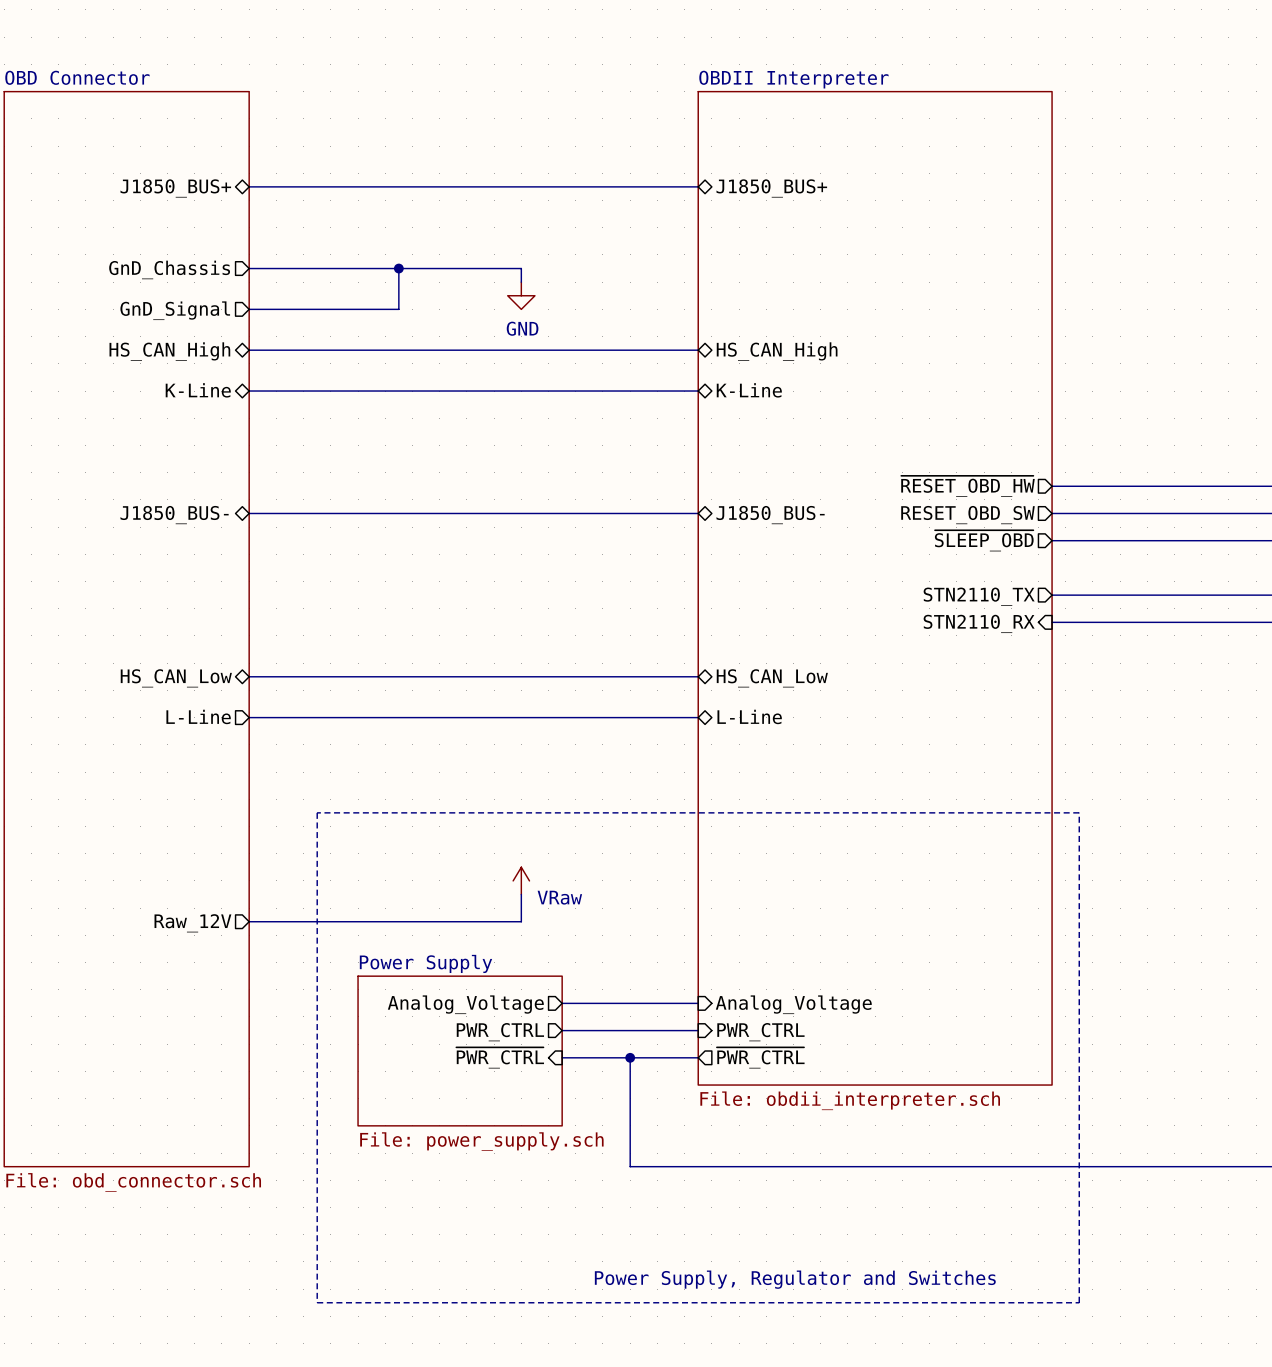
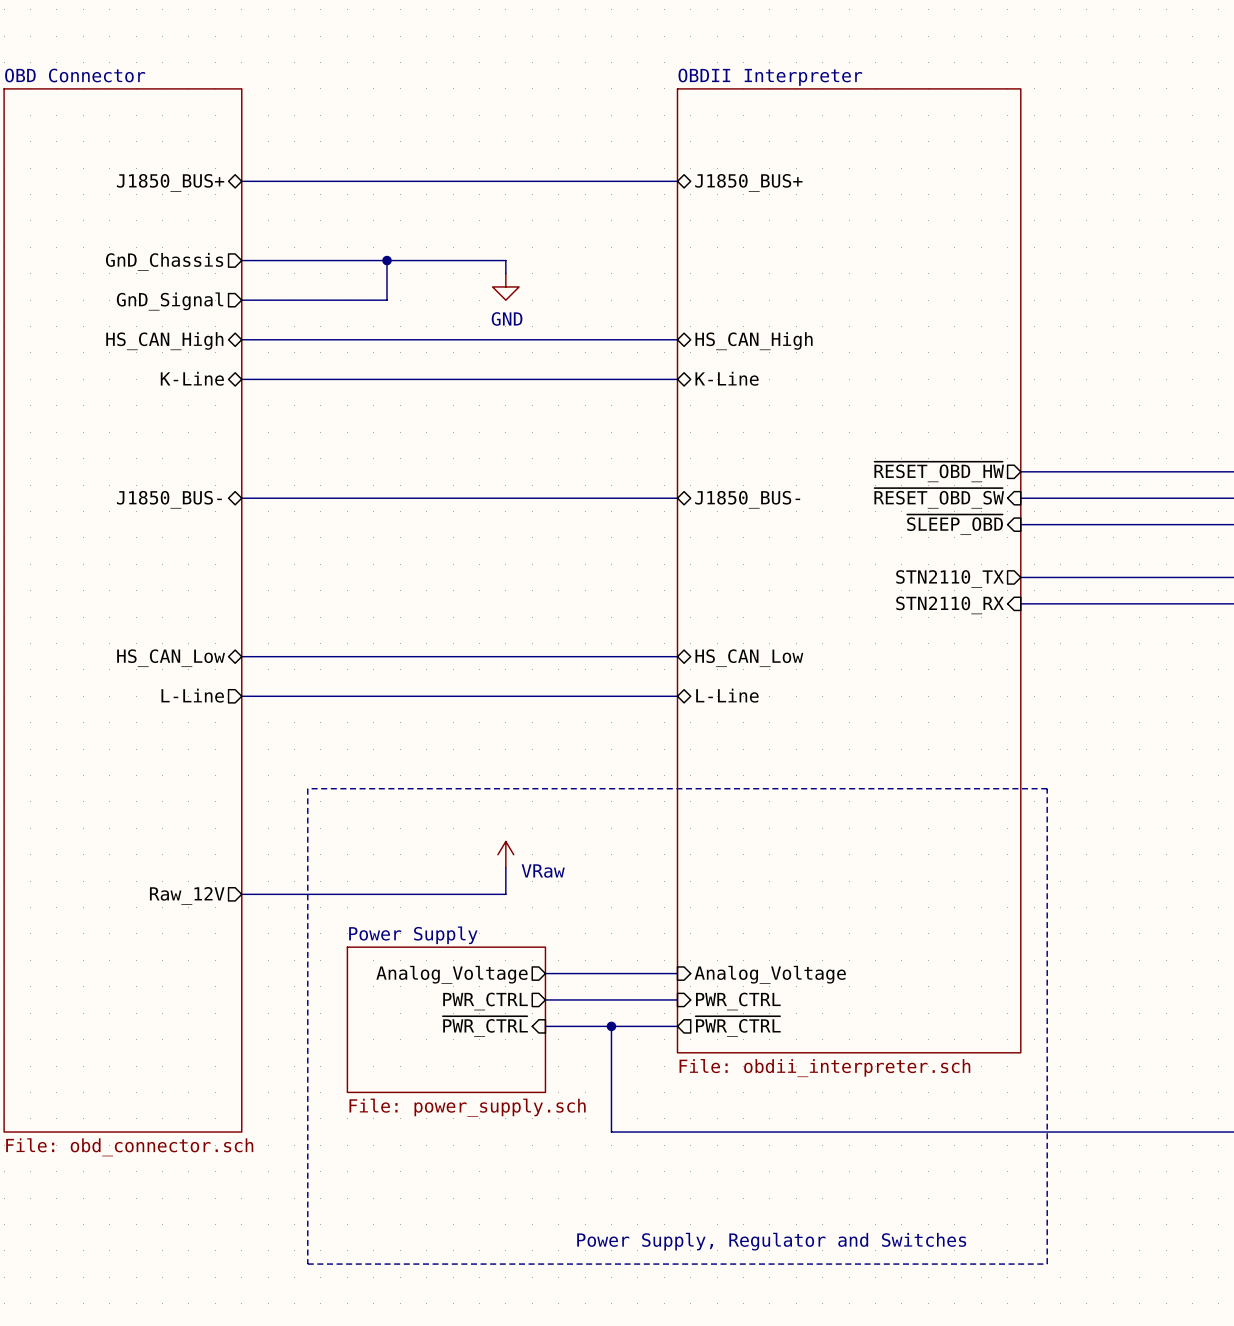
sheet pin shape: output (967, 515) -> input (939, 498)
sheet pin: RESET_OBD_SW (967, 515) -> ~{RESET_OBD_SW} (939, 498)
sheet pin shape: output (984, 540) -> input (955, 524)

